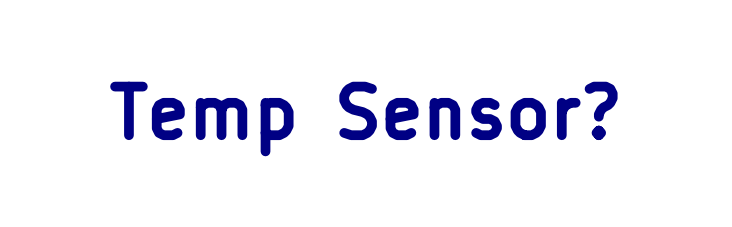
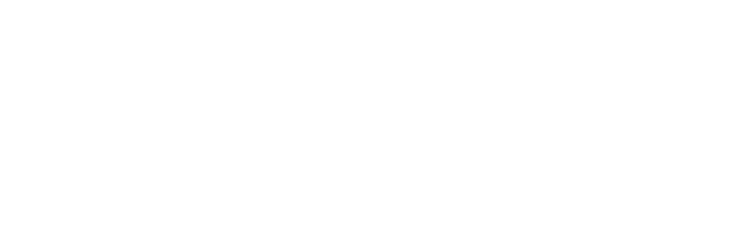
text: Temp Sensor? (363, 119) -> none

